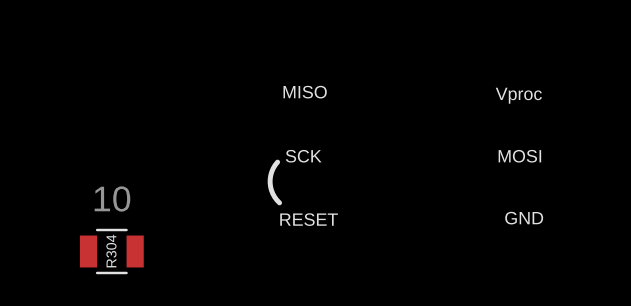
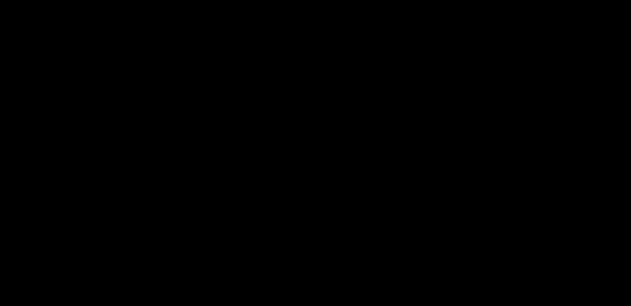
text: MISO (305, 92) -> none
text: Vproc (518, 95) -> none
text: SCK (303, 156) -> none
text: MOSI (519, 156) -> none
line: (277, 162) (271, 171) (270, 182) (272, 193) (279, 202) -> none
text: GND (524, 218) -> none
text: RESET (309, 219) -> none
R304: 10 (111, 251) -> none

